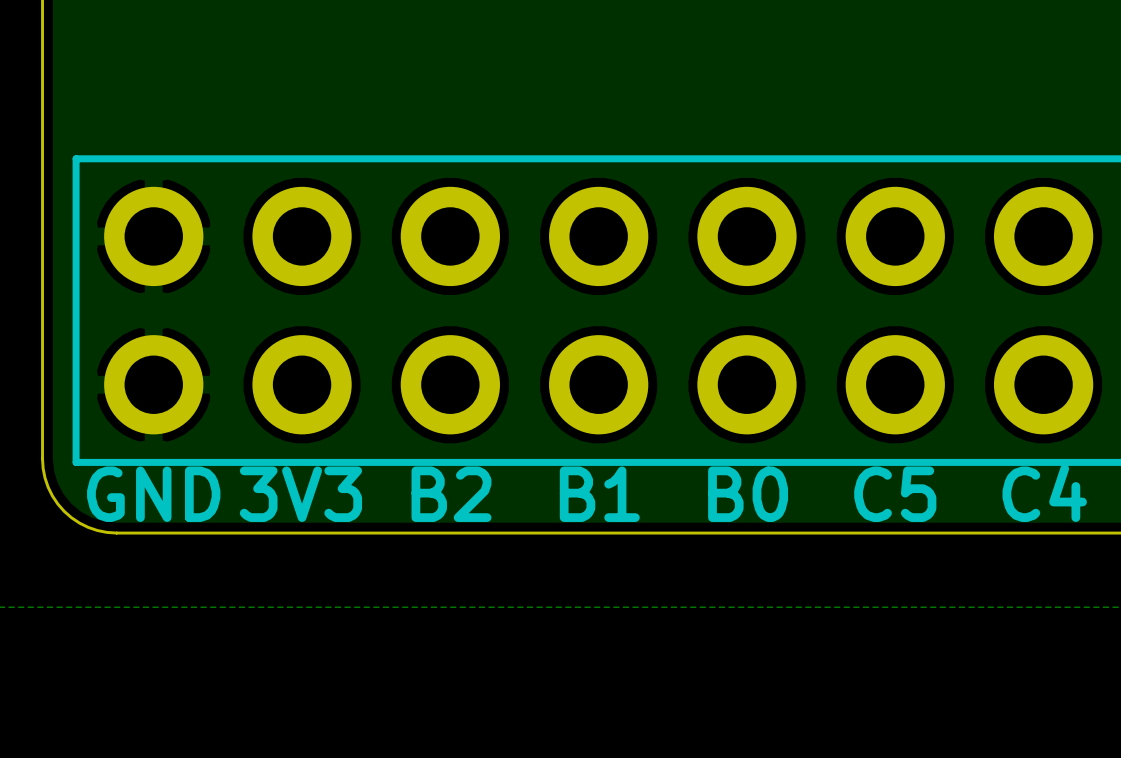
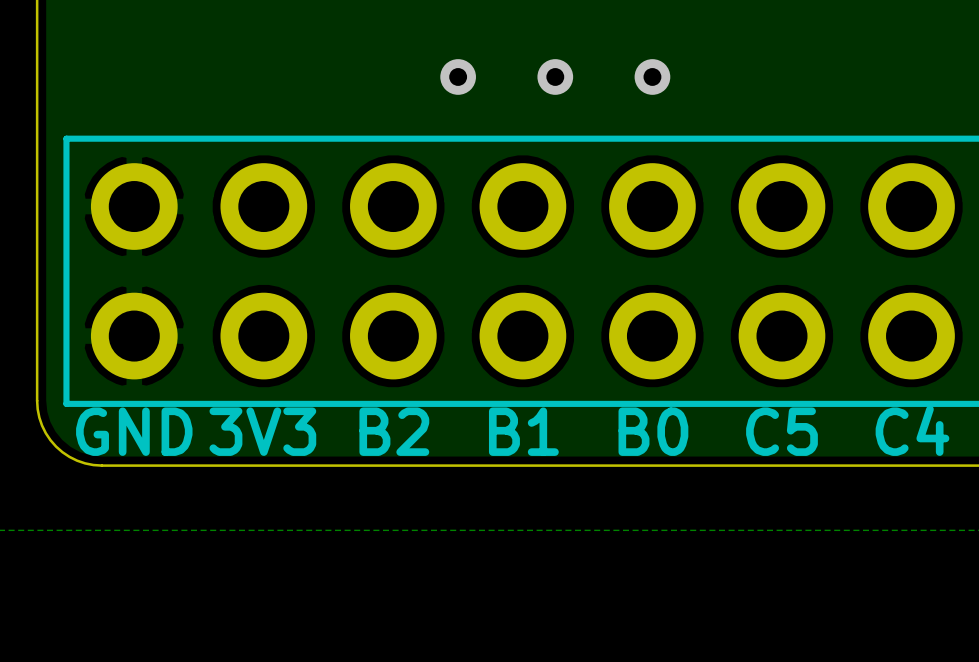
via: none -> (458, 76)
via: none -> (555, 76)
via: none -> (652, 76)

